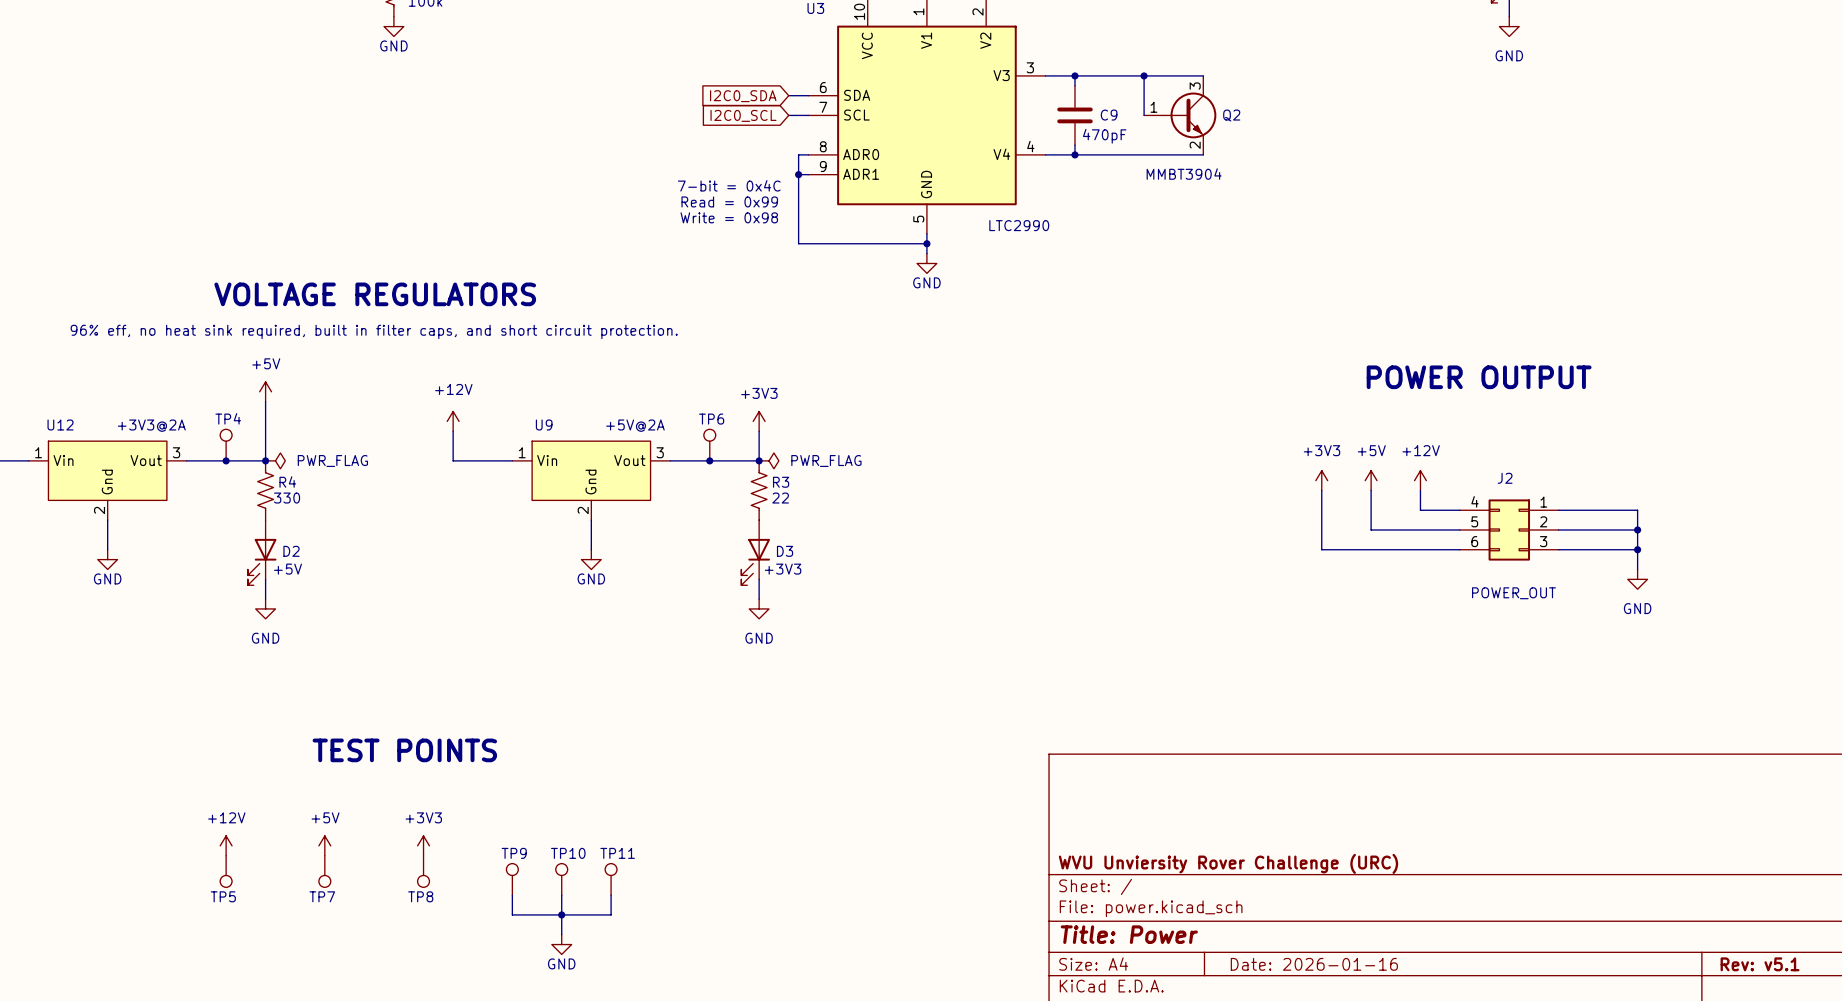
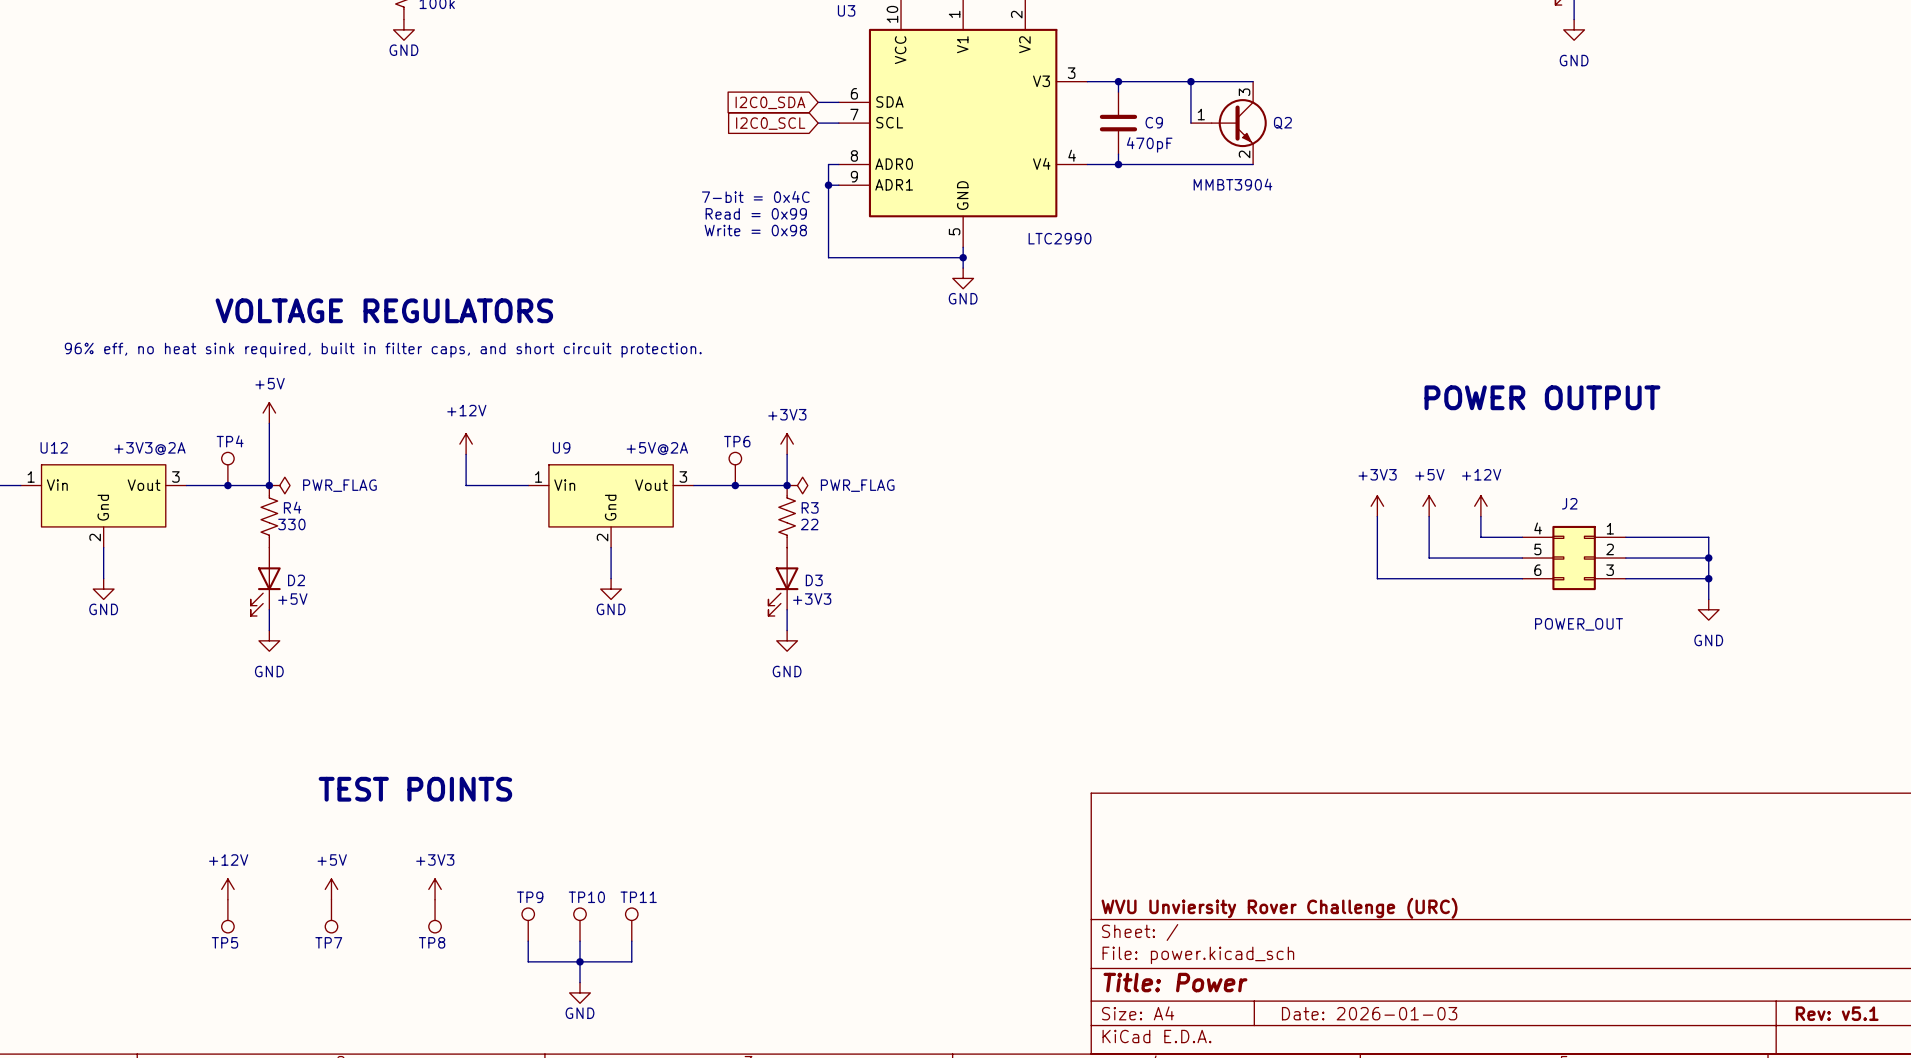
title block: Date: 2026-01-16 (1314, 964) -> Date: 2026-01-03 (1369, 1013)

